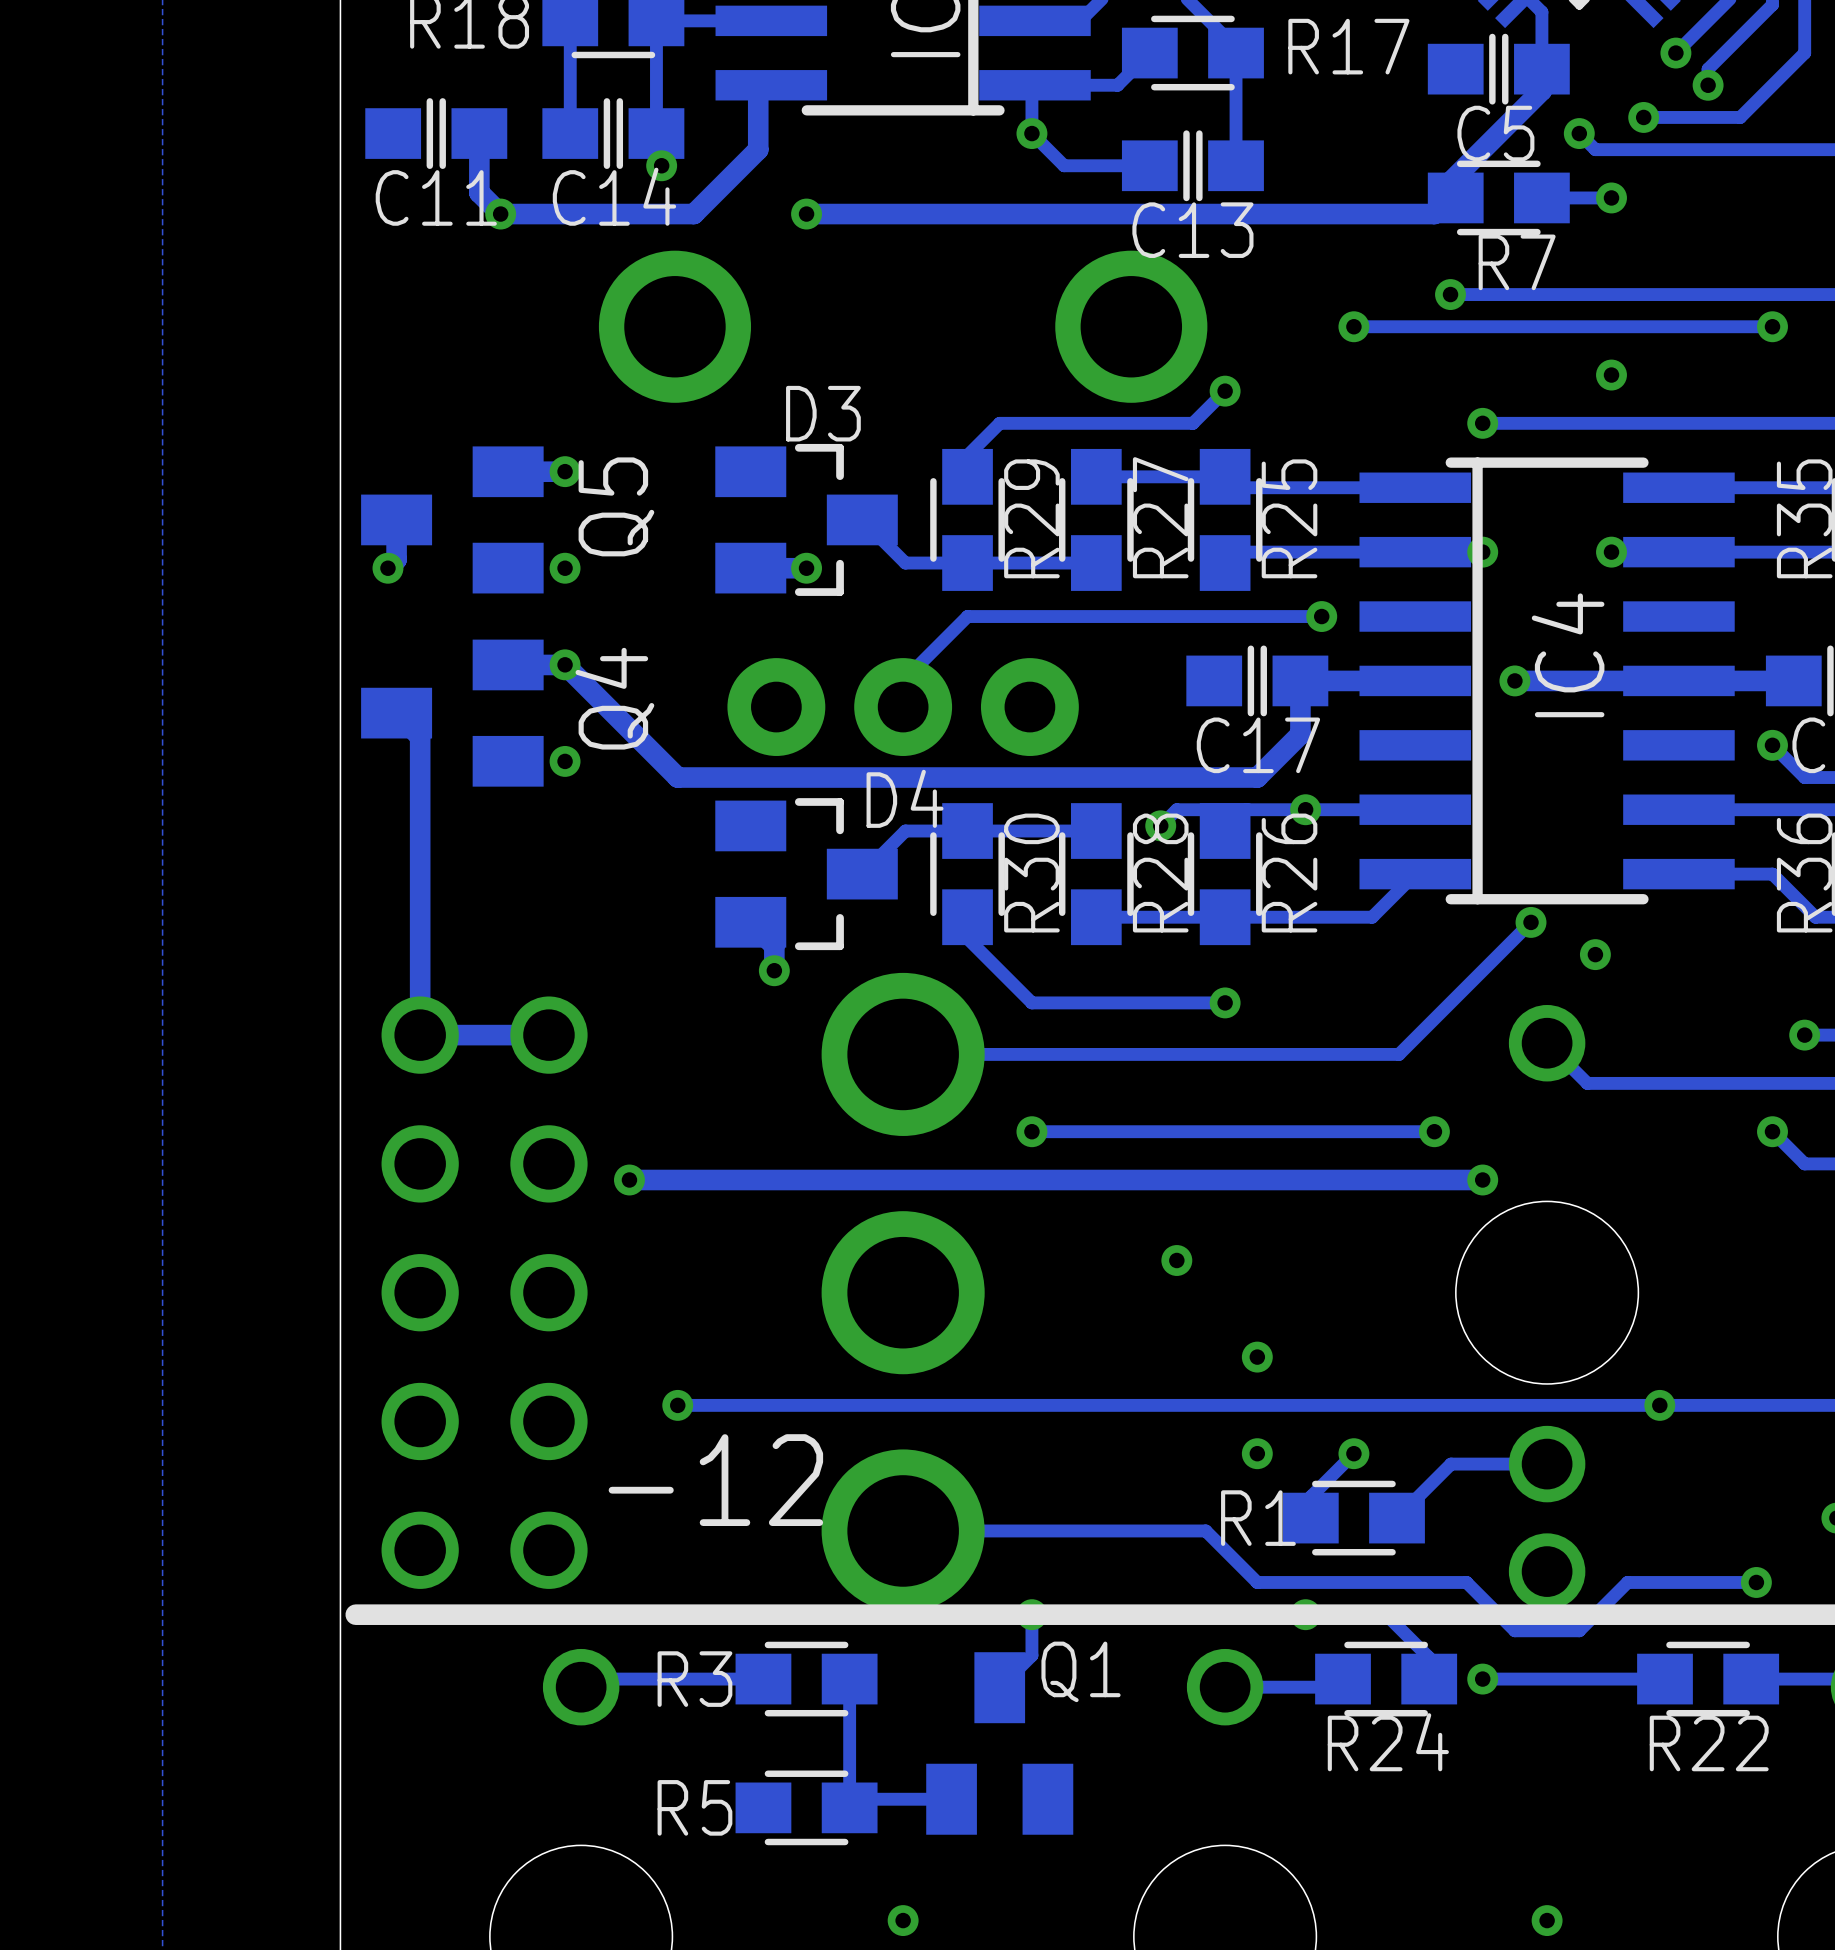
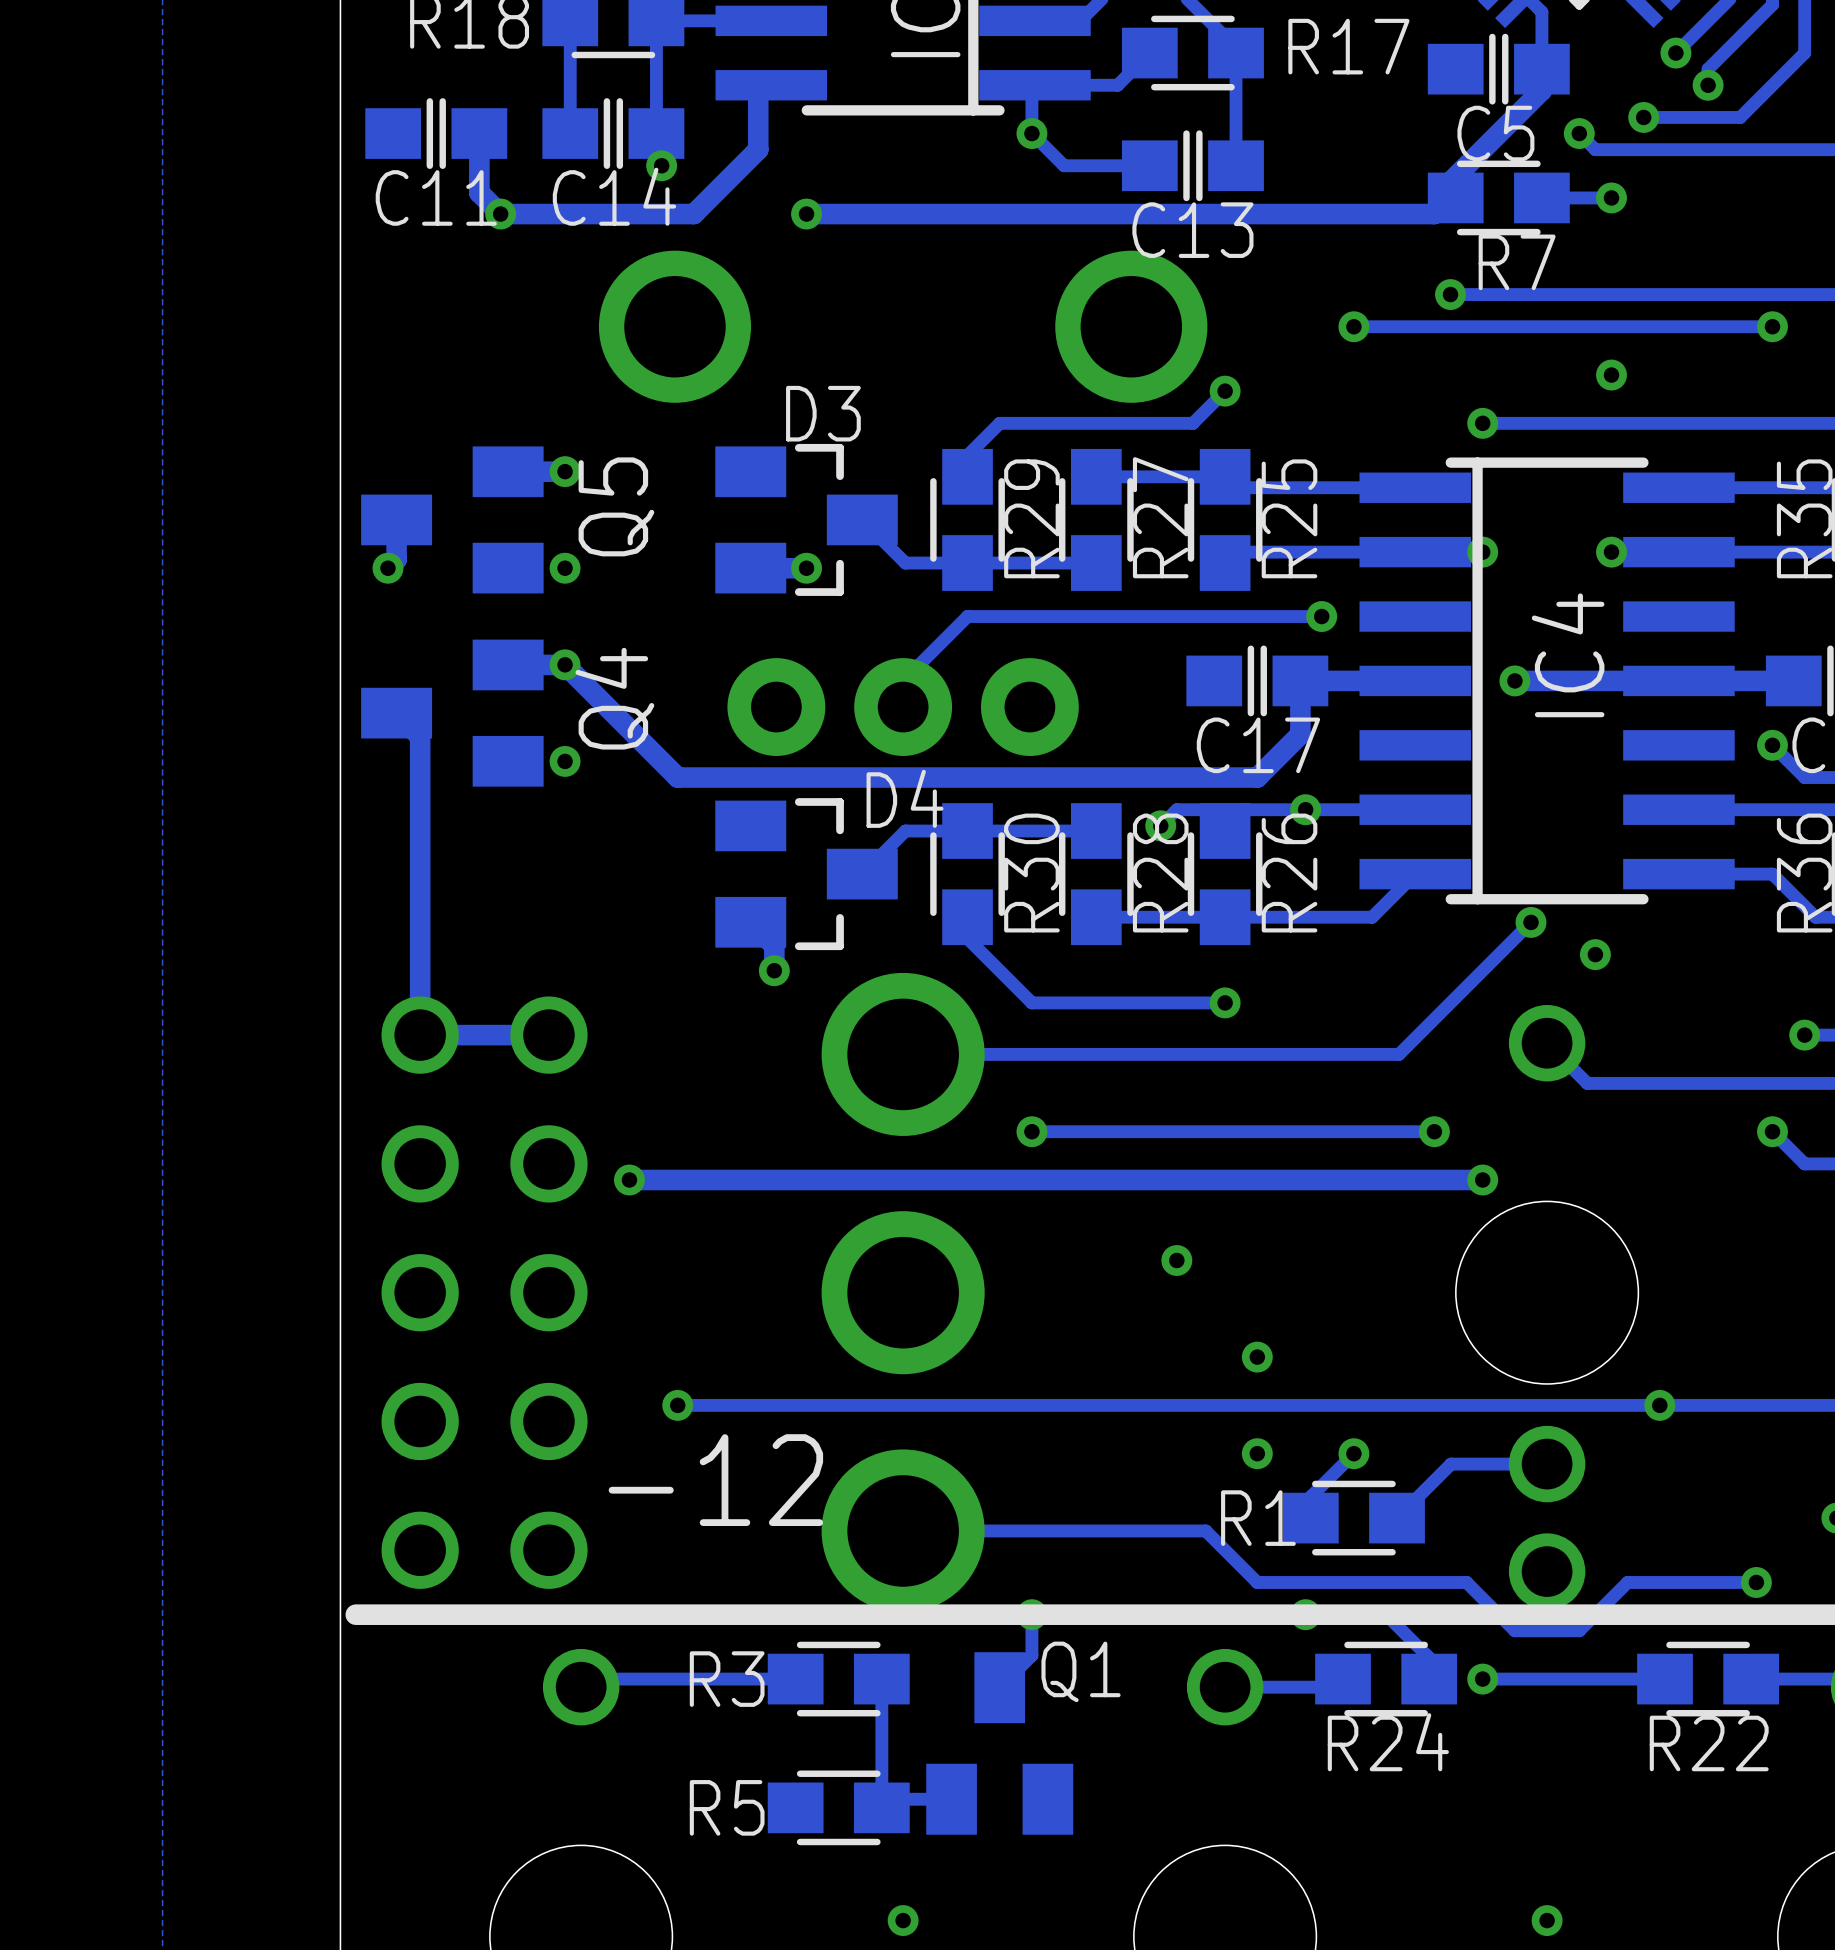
R3 position: (806, 1679) -> (838, 1679)
track: (849, 1679) (849, 1807) (858, 1799) (890, 1799) -> (881, 1679) (881, 1807) (890, 1799)
R5 position: (806, 1807) -> (838, 1807)

